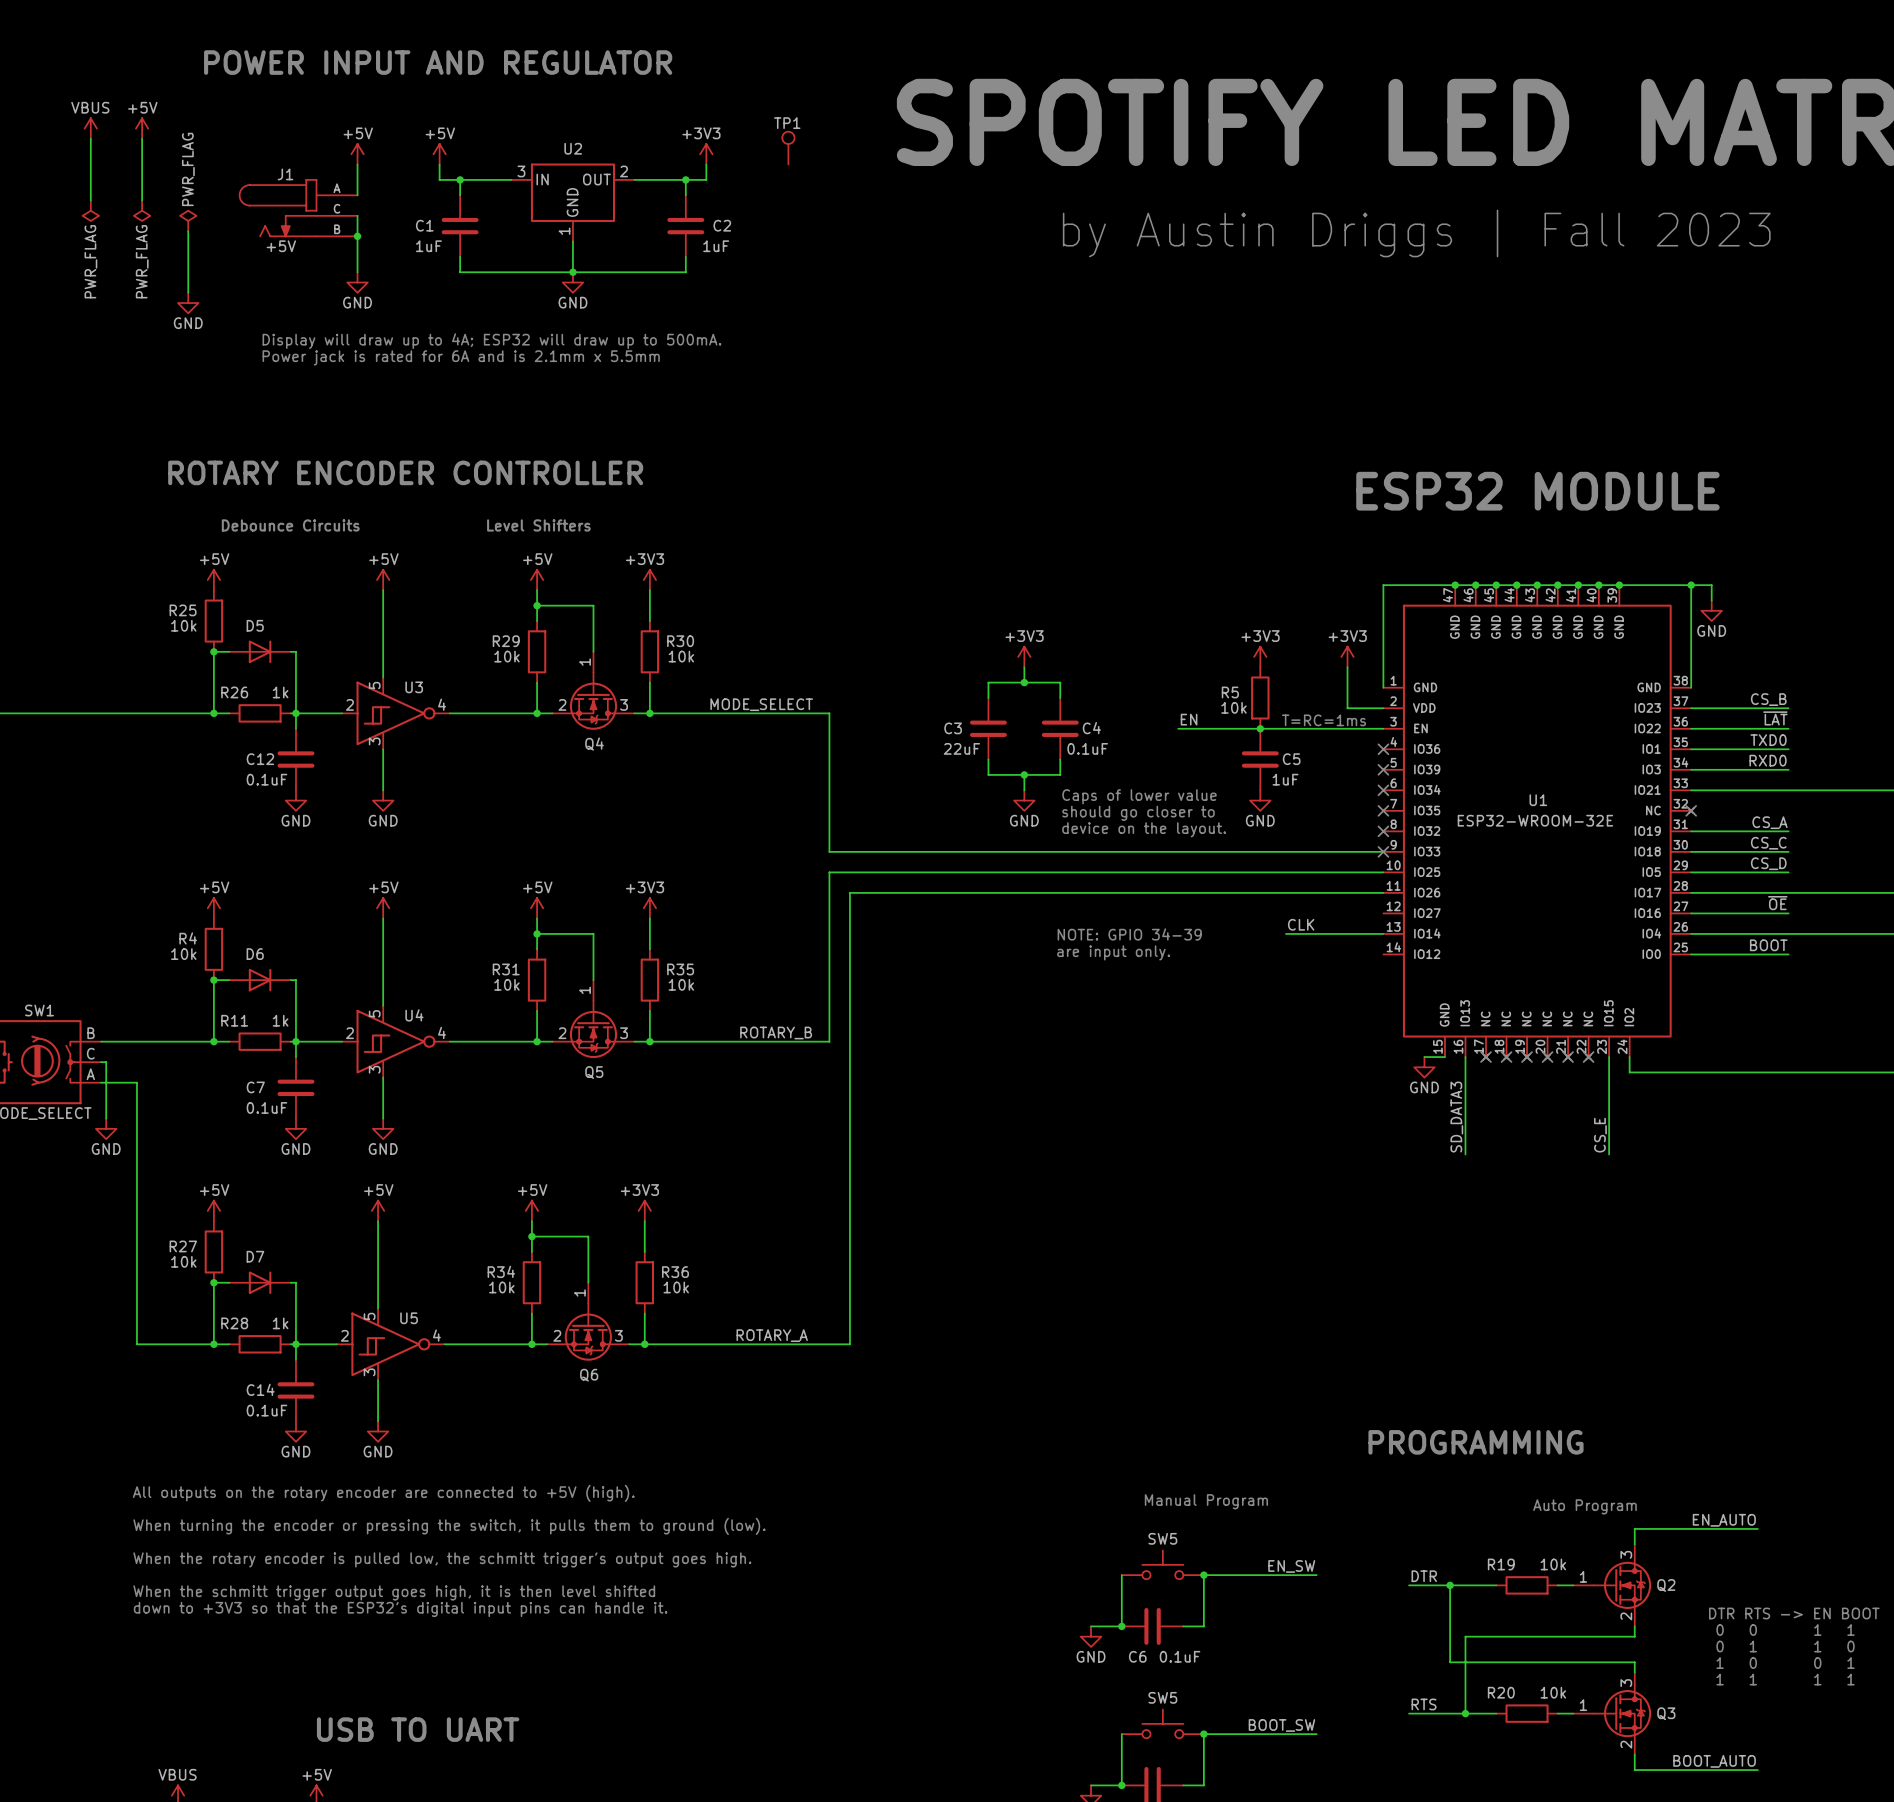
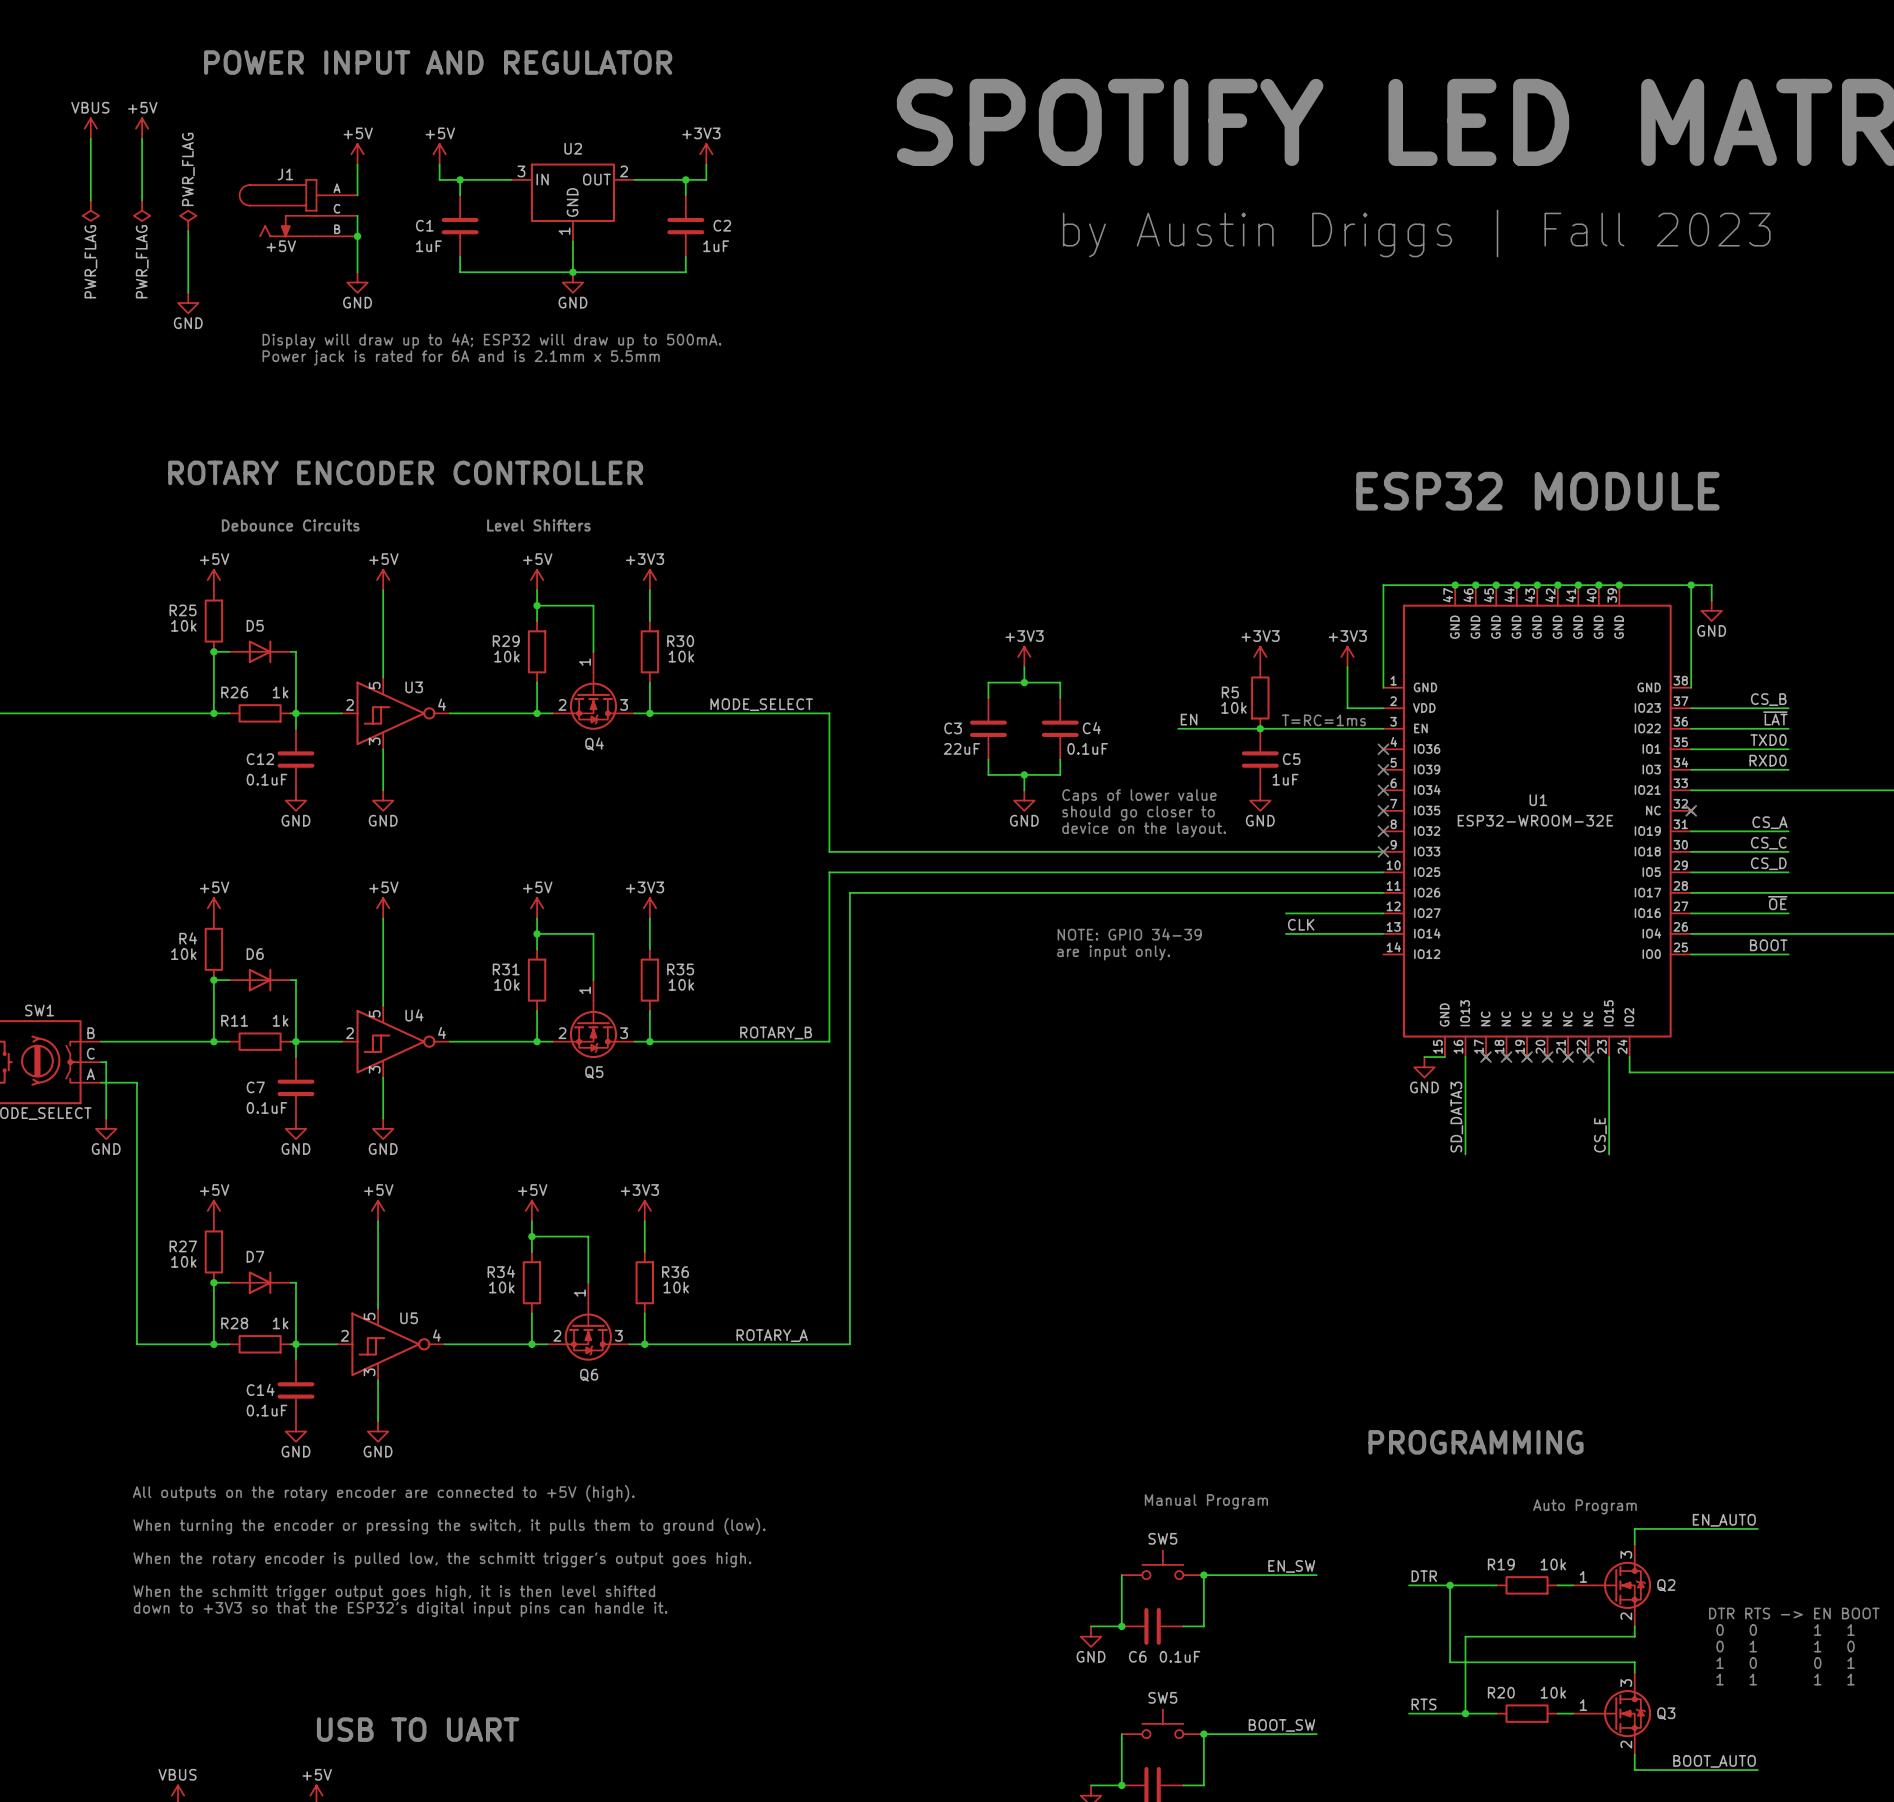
TP1: (788, 148) -> none
wire: none -> (1285, 913) (1383, 913)

